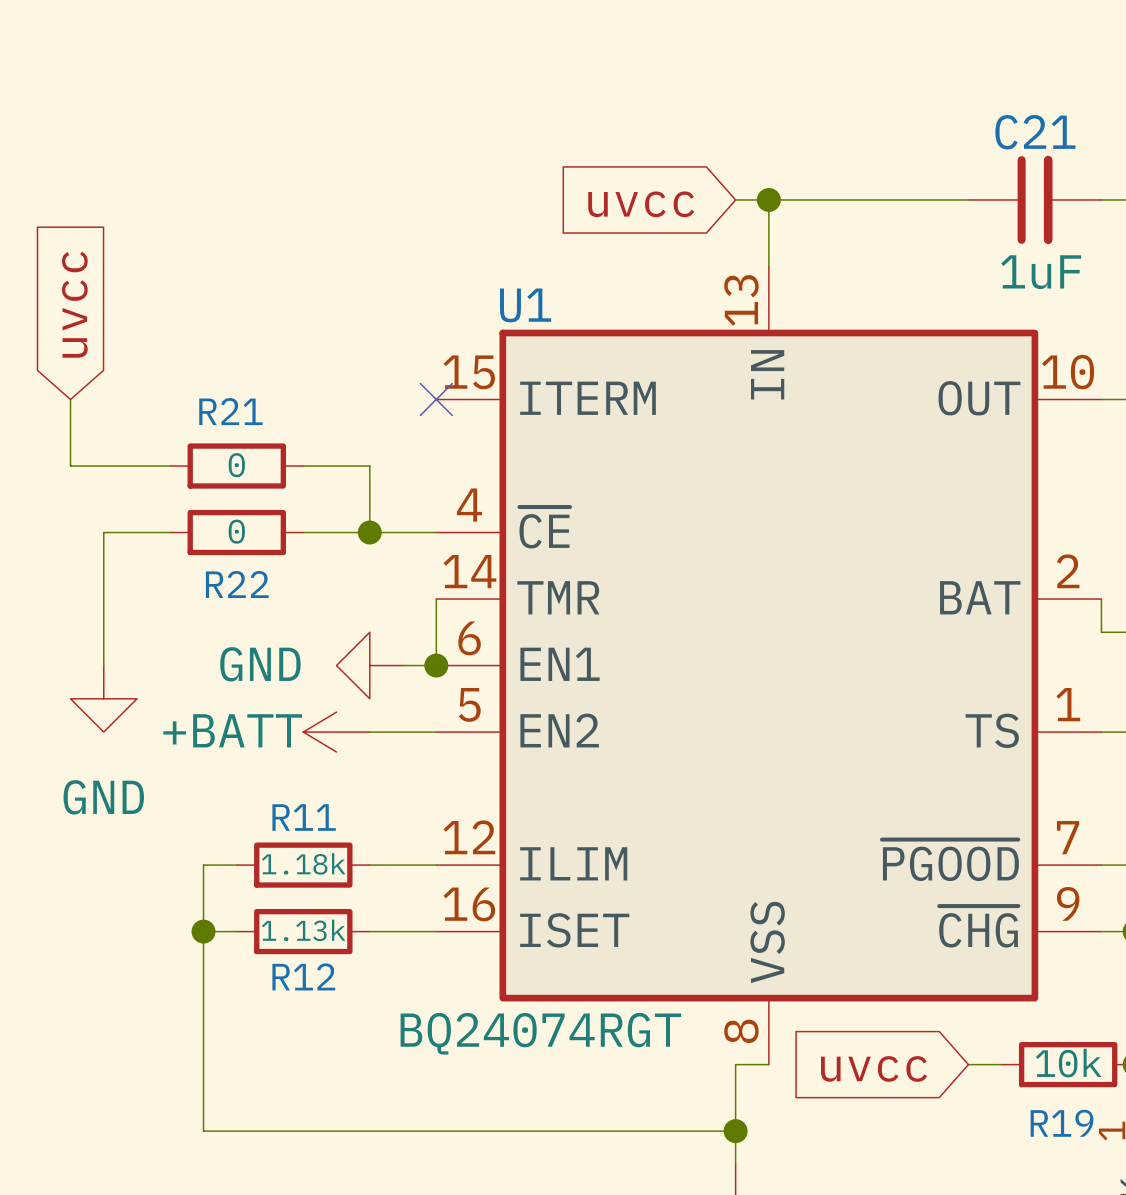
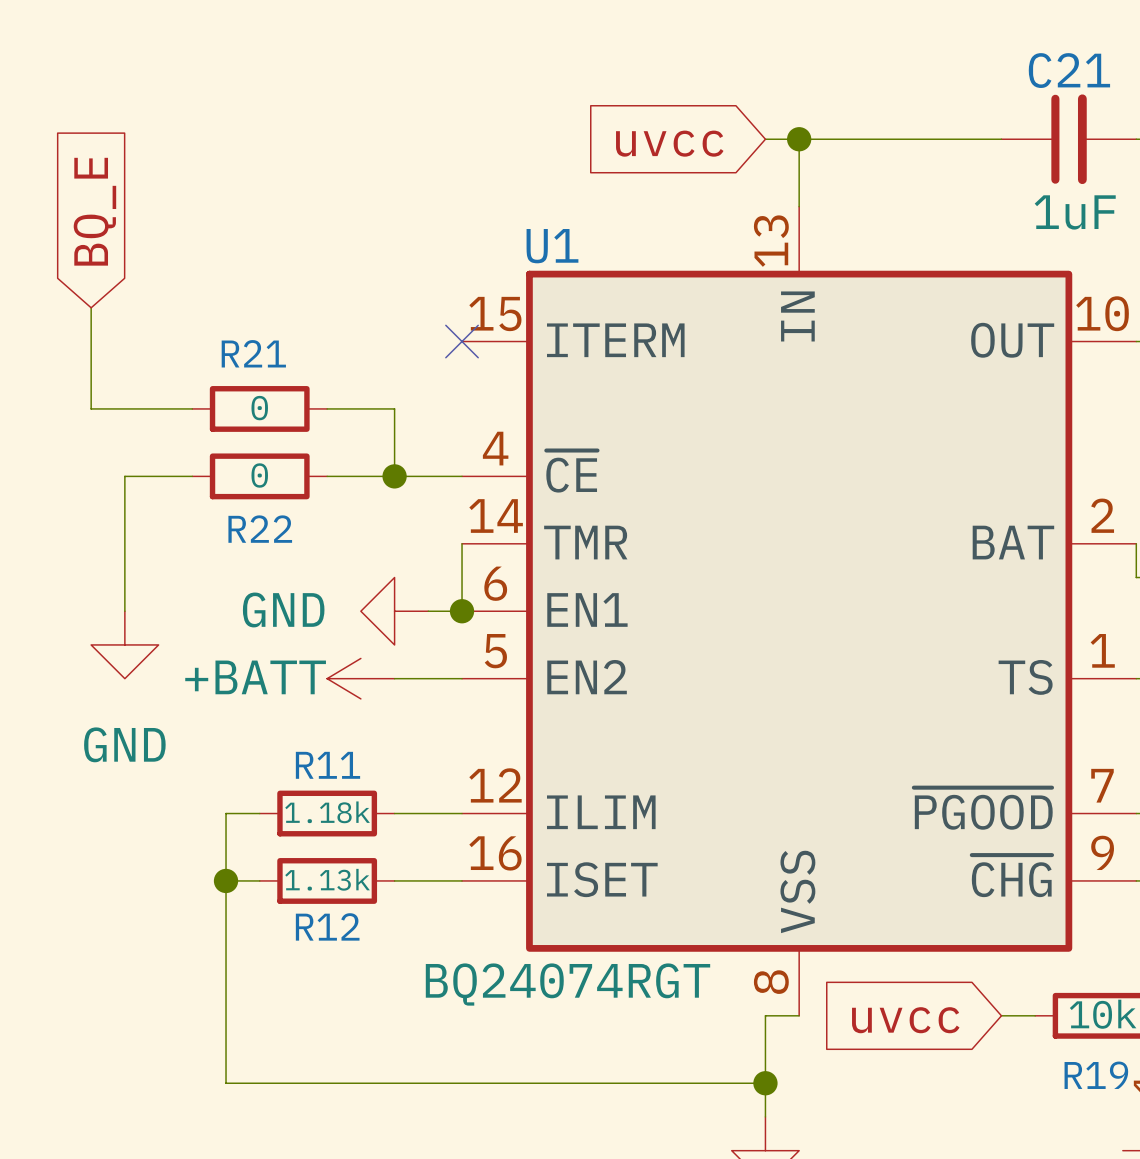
global label: none -> BQ_E (94, 211)
global label: uvcc (74, 304) -> none
wire: none -> (91, 307) (91, 341)

